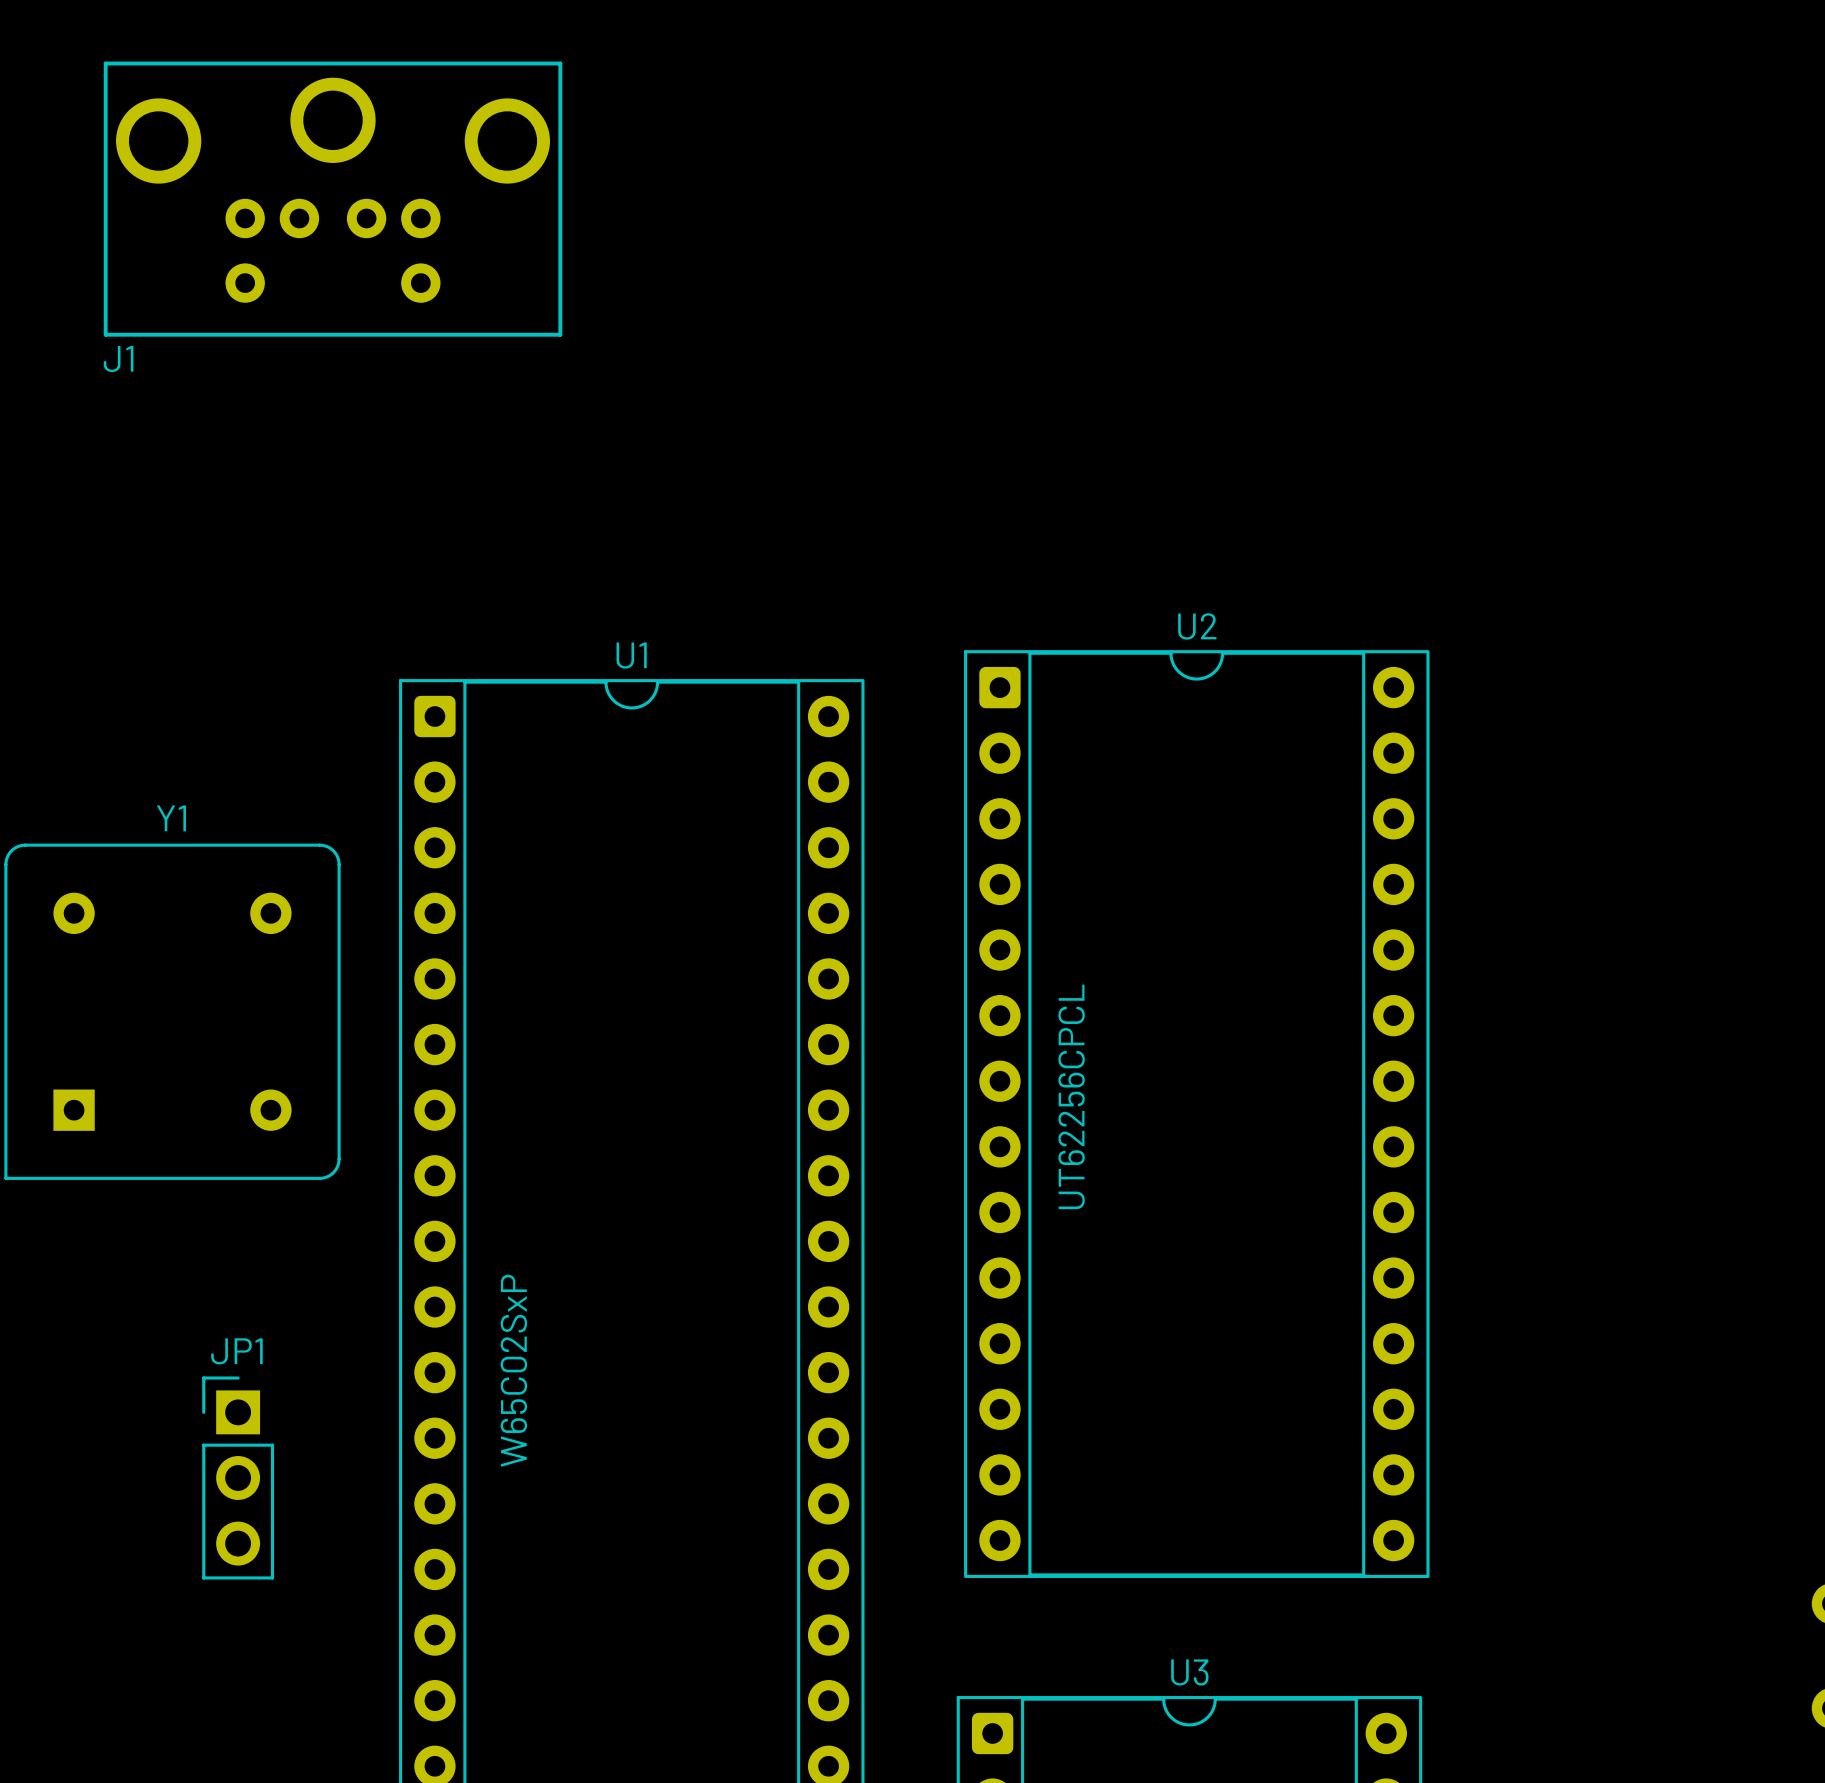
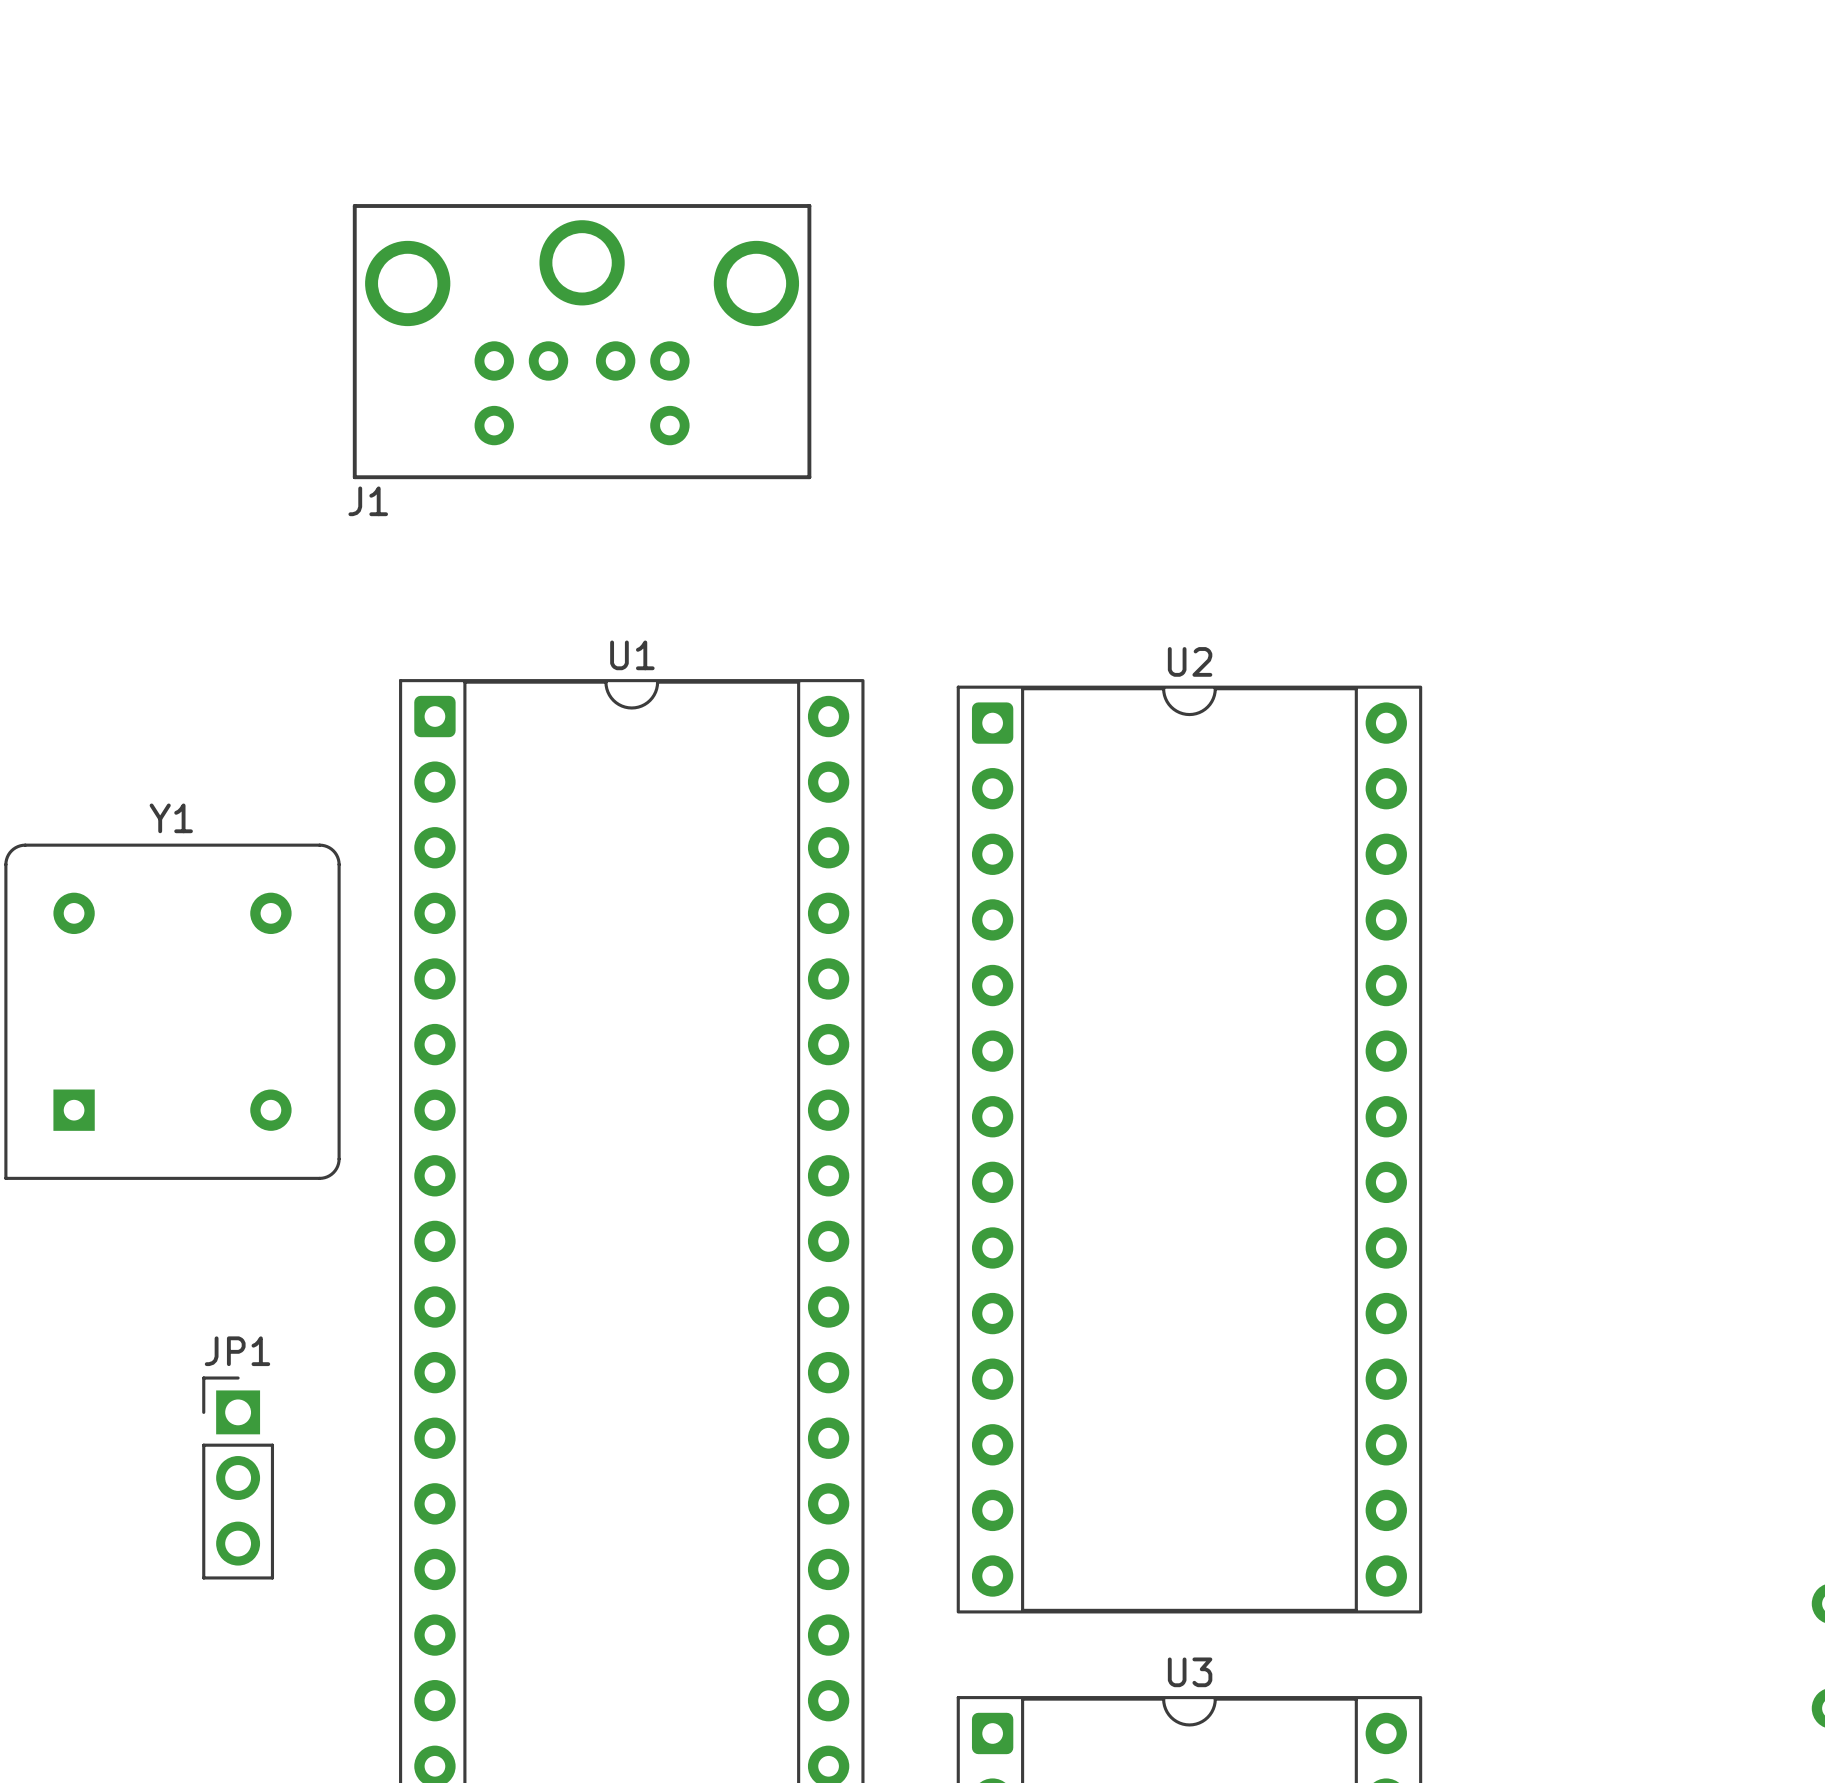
J1 position: (333, 199) -> (582, 341)
U2 value: UT62256CPCL (1071, 1096) -> none
U2 position: (1196, 1114) -> (1189, 1149)
U1 value: W65C02SxP (513, 1370) -> none

